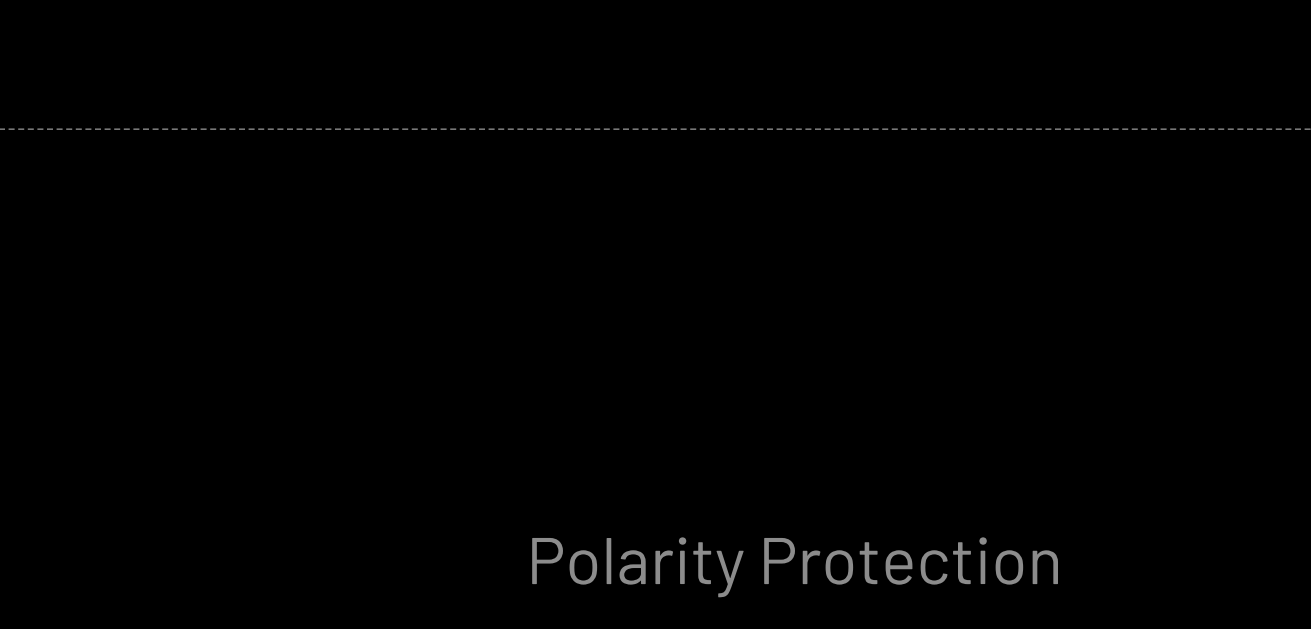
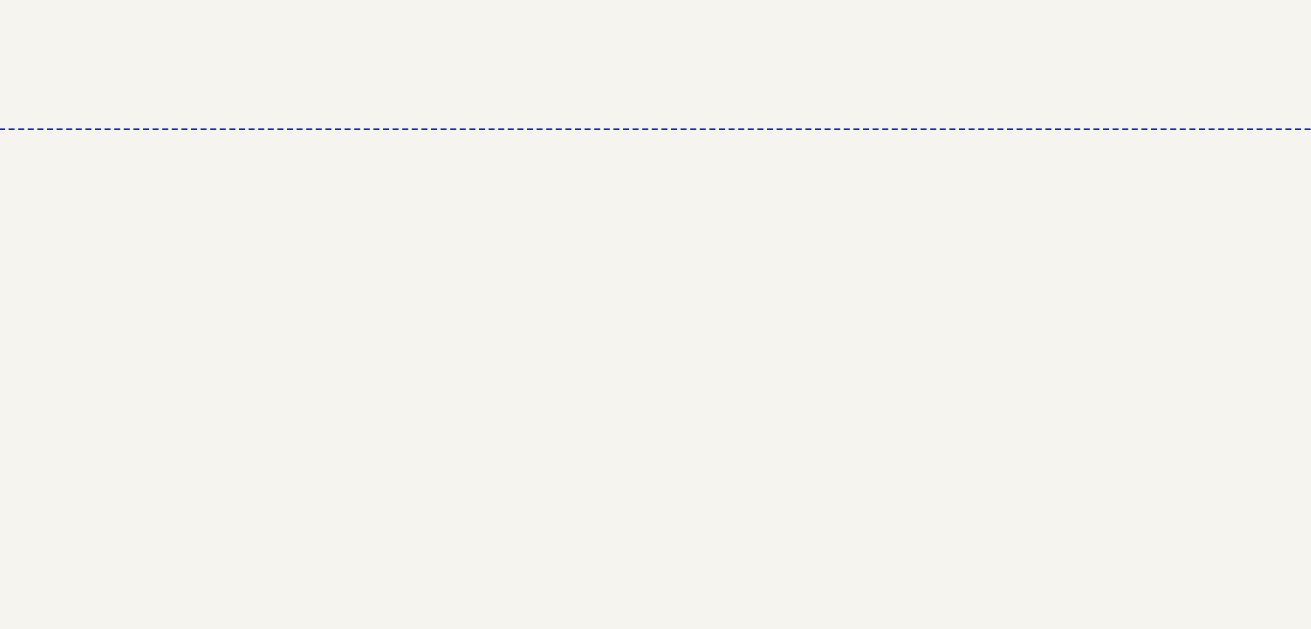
text: Polarity Protection (795, 567) -> none

